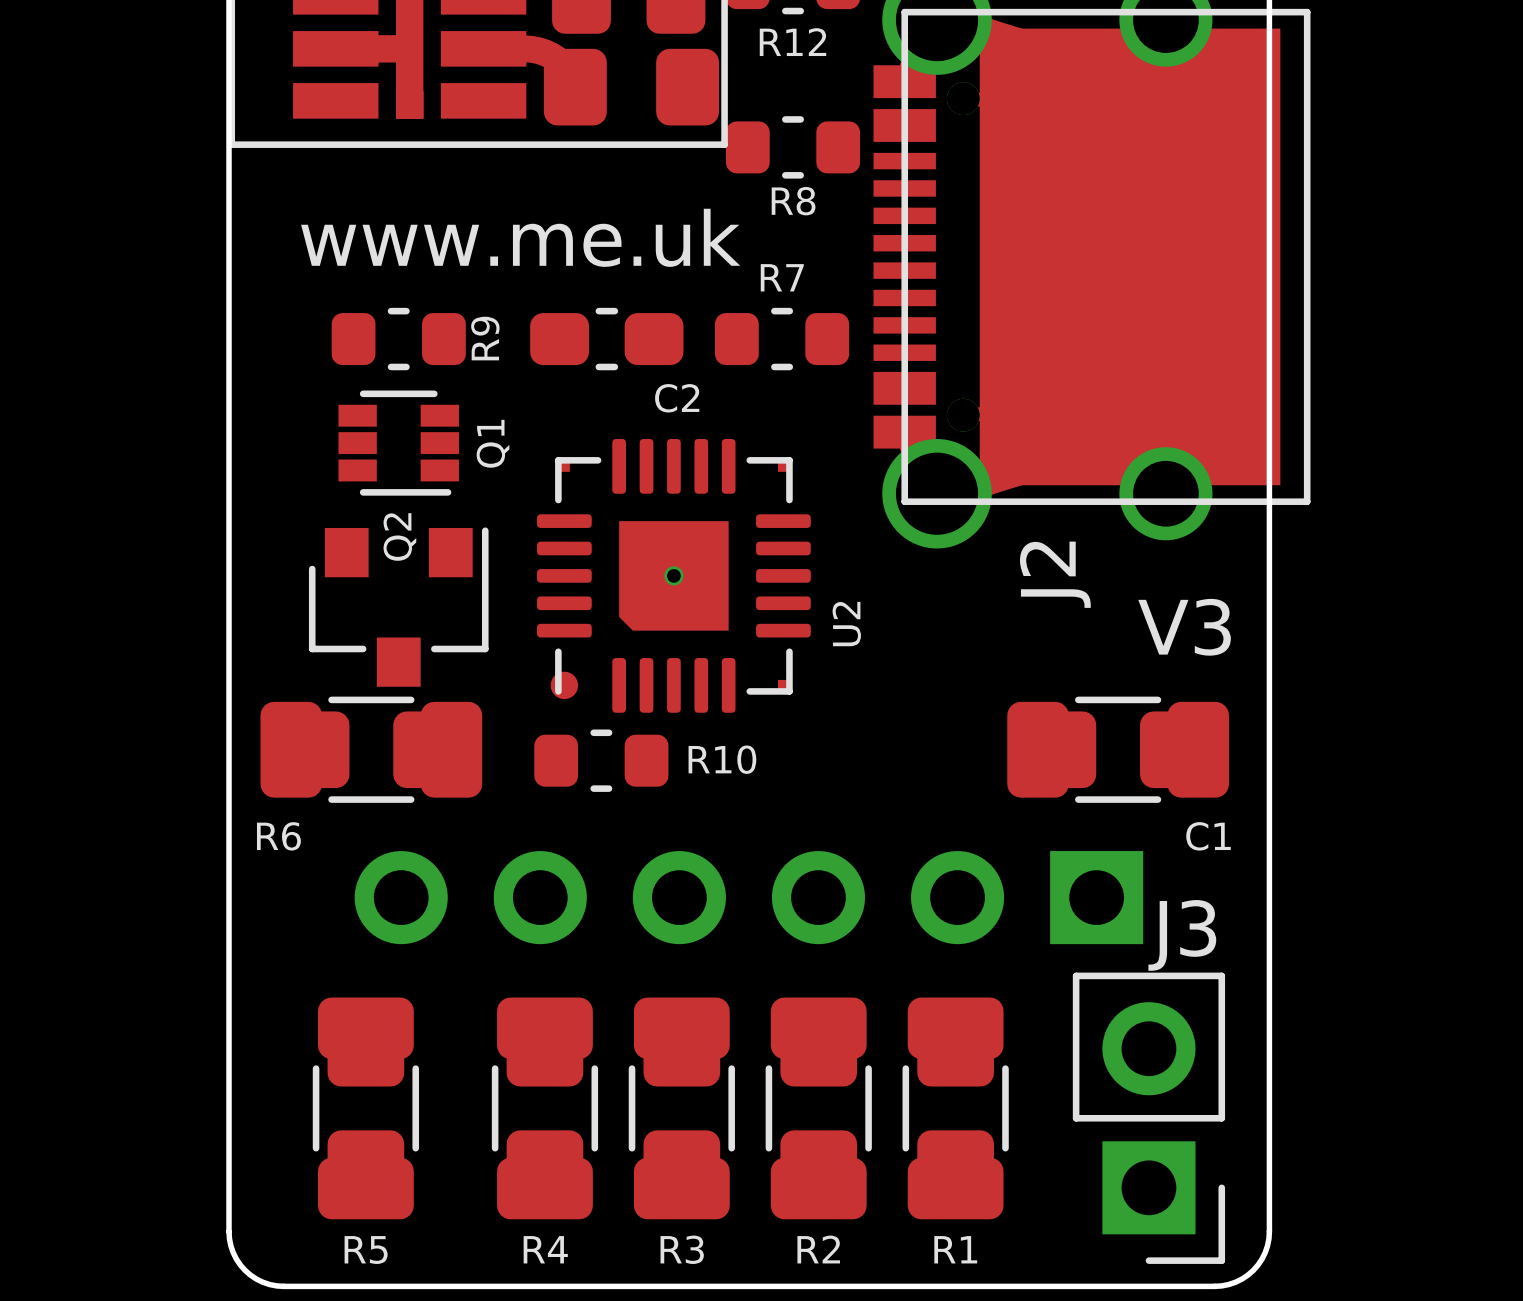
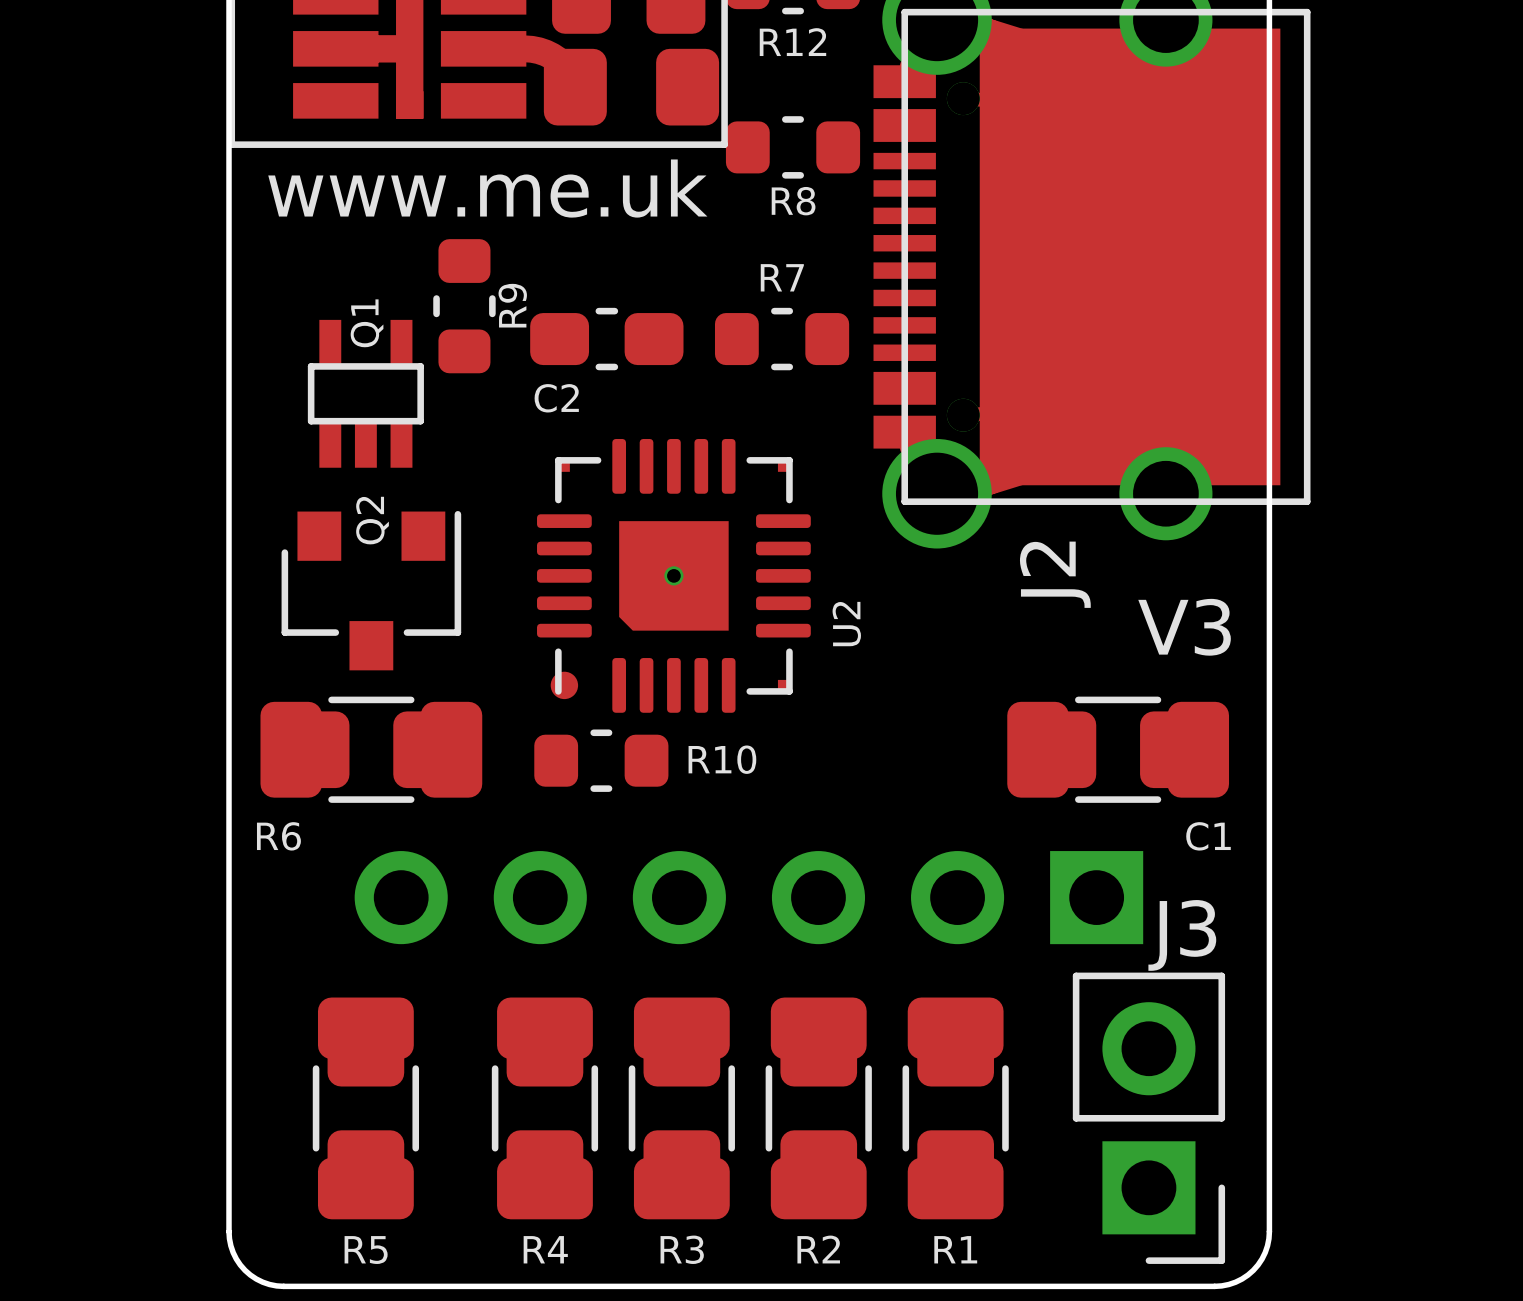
text position: www.me.uk (520, 237) -> www.me.uk (487, 188)
R9 rotation: 0° (398, 339) -> 90° clockwise (464, 306)
Q1 footprint: [338, 390, 459, 496] -> [307, 319, 424, 468]
C2 name position: C2 (677, 398) -> C2 (556, 398)
Q1 name position: Q1 (492, 443) -> Q1 (367, 323)
Q2 position: (398, 607) -> (371, 590)

